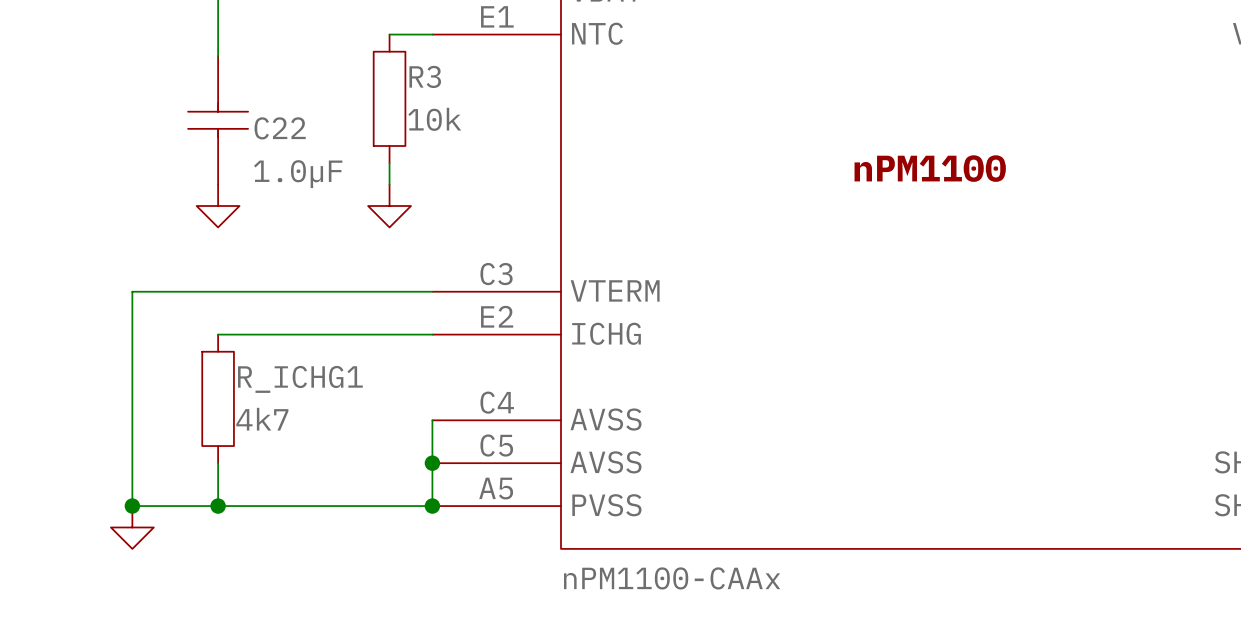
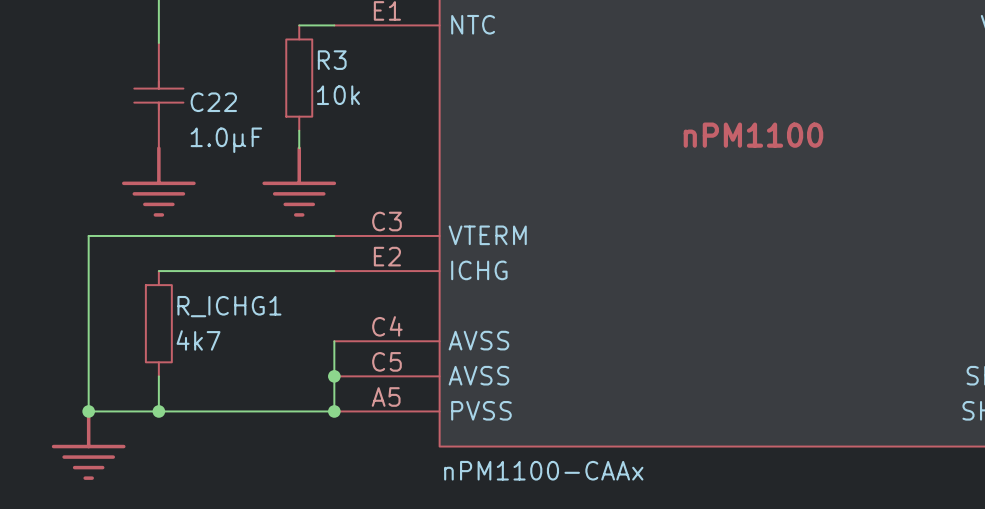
power symbol: (218, 206) -> none
power symbol: (389, 206) -> none
power symbol: none -> (158, 181)
power symbol: none -> (299, 181)
power symbol: (132, 527) -> none
power symbol: none -> (88, 444)

